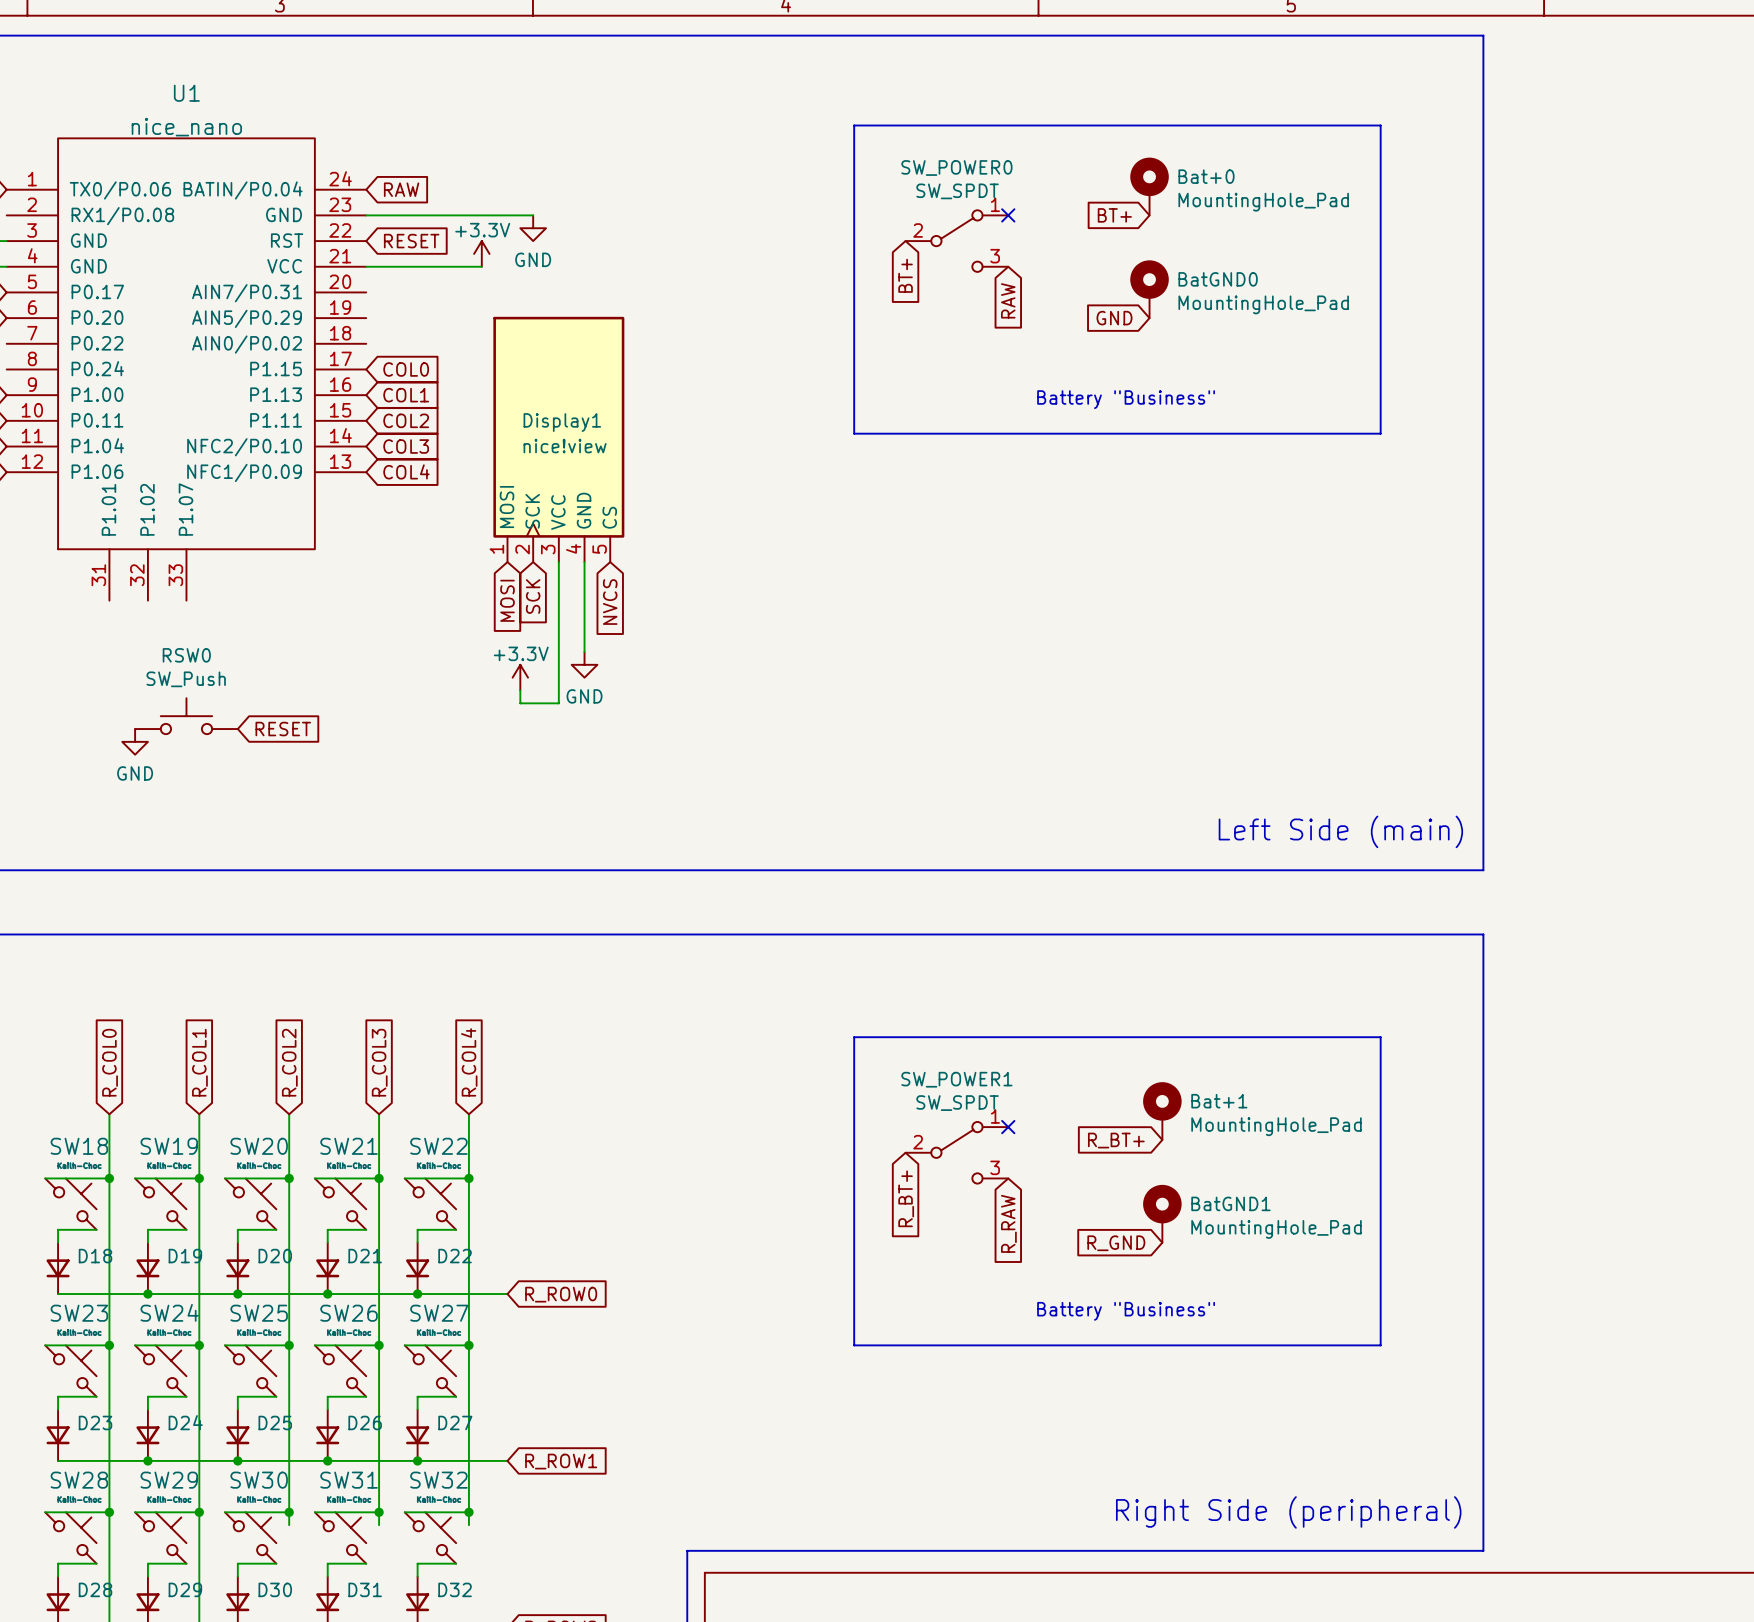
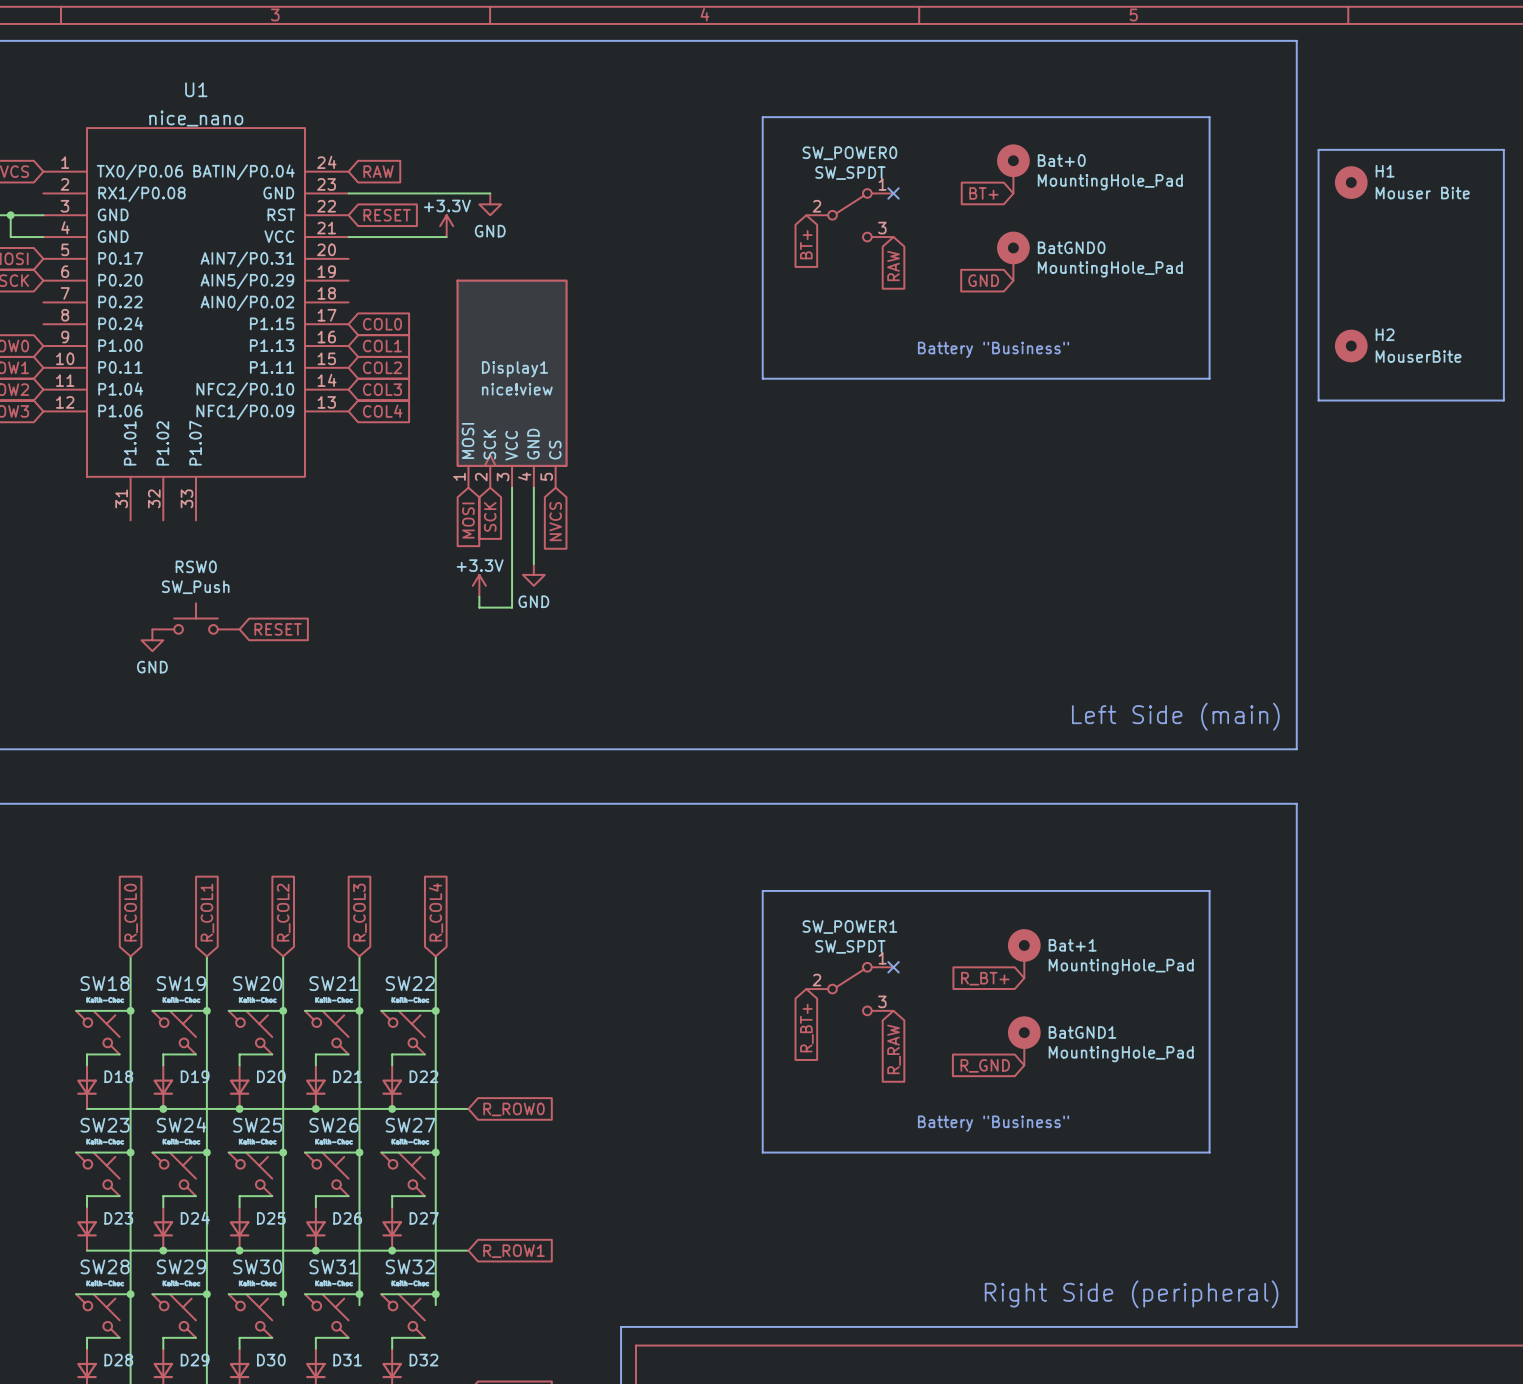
line: none -> (1318, 149) (1318, 400) (1503, 400) (1503, 149) (1318, 149)
H1: none -> Mouser Bite (1351, 182)
H2: none -> MouserBite (1351, 346)

